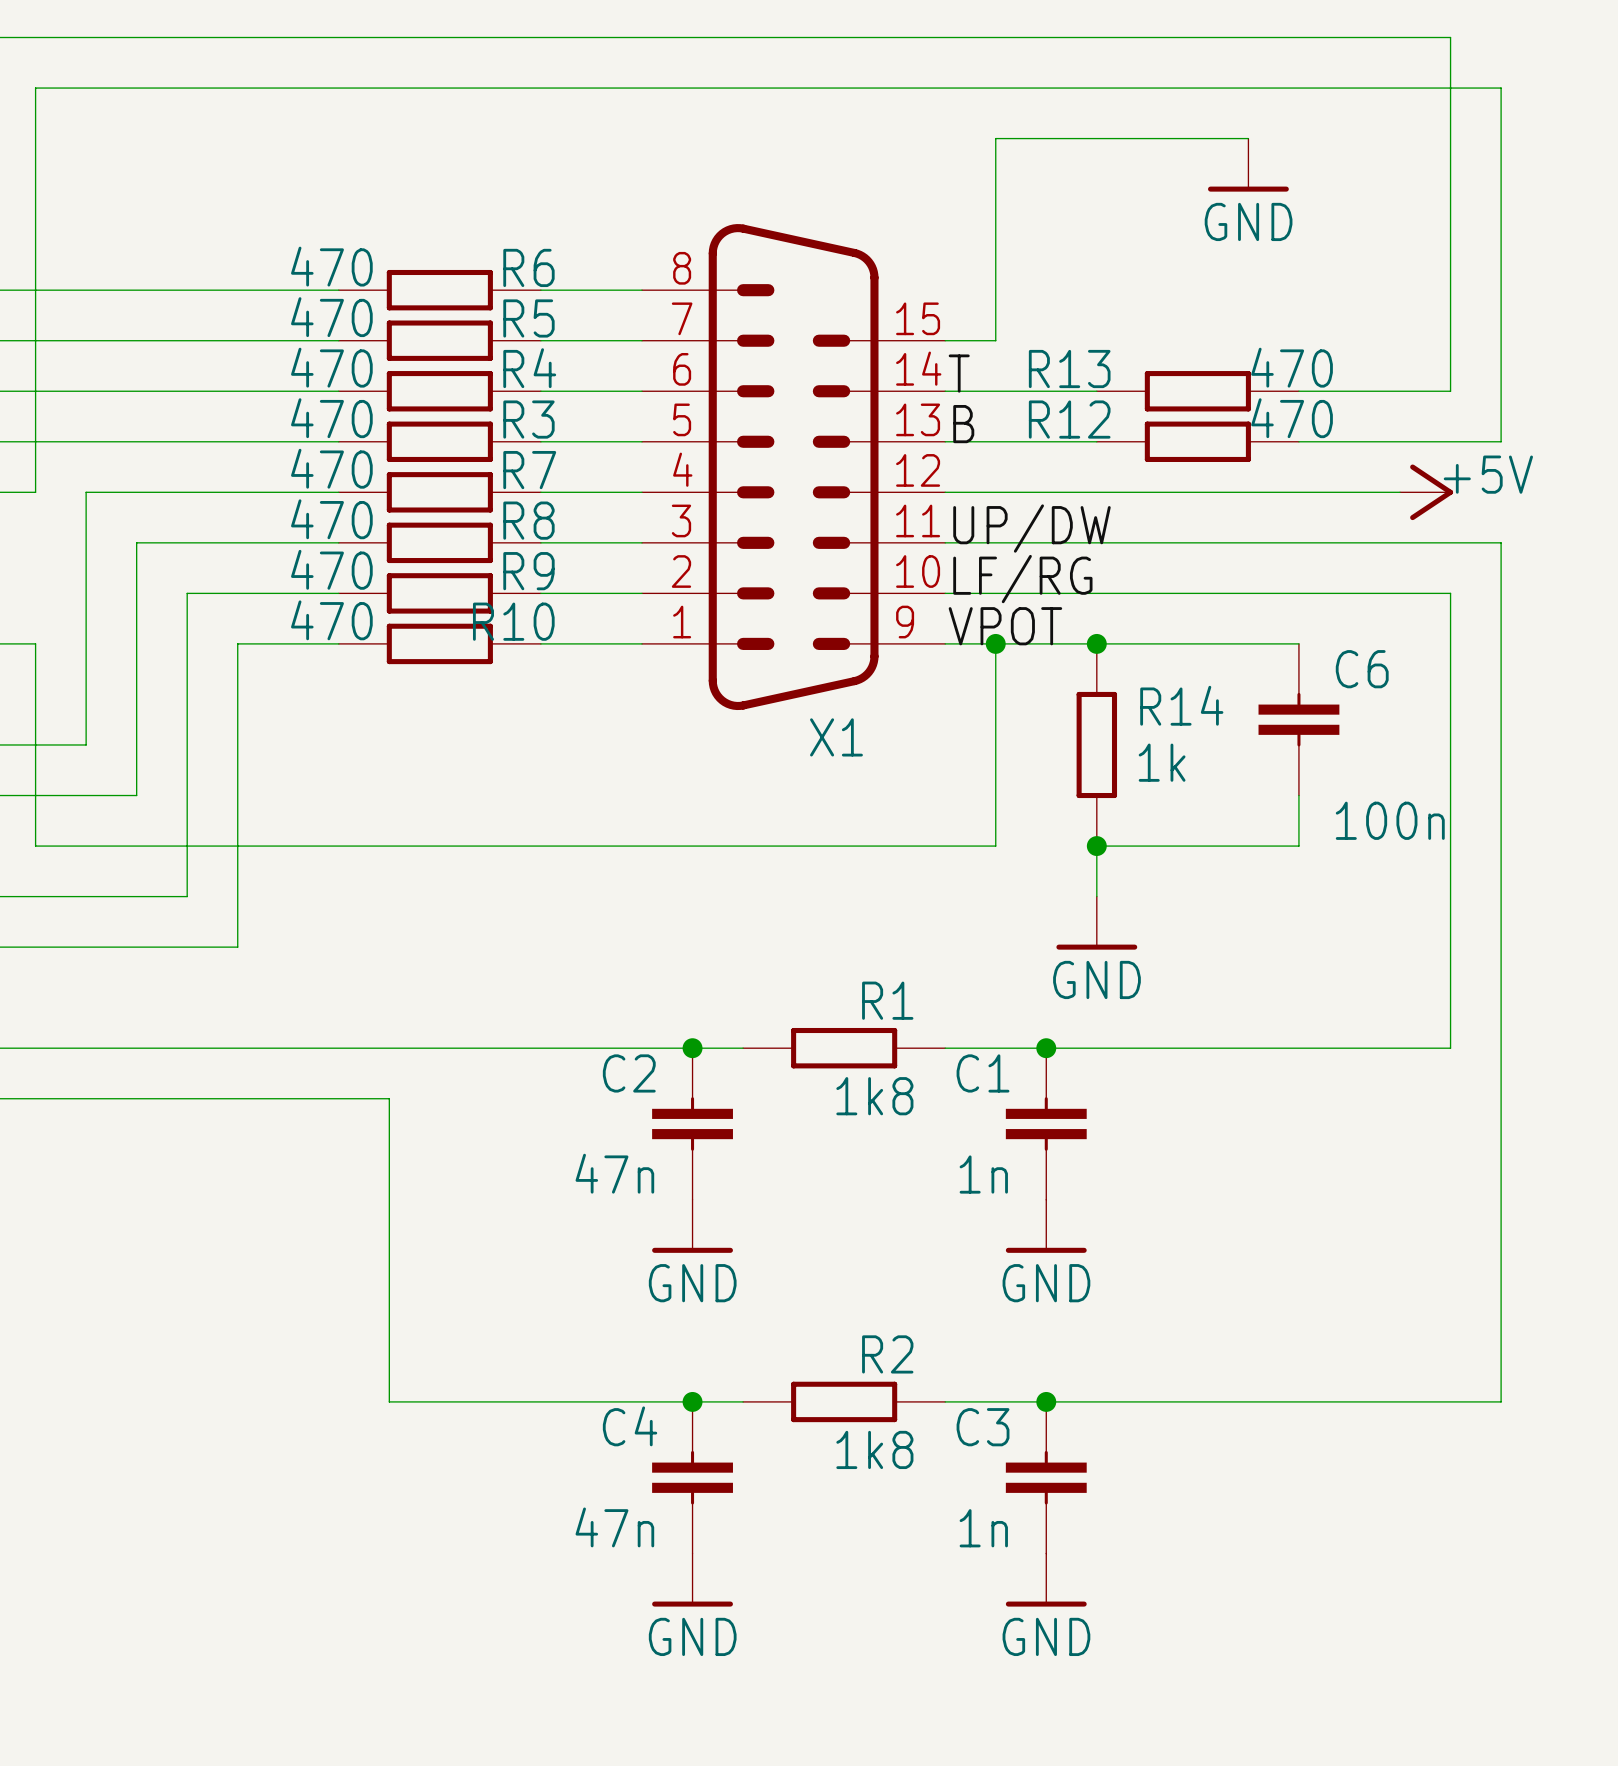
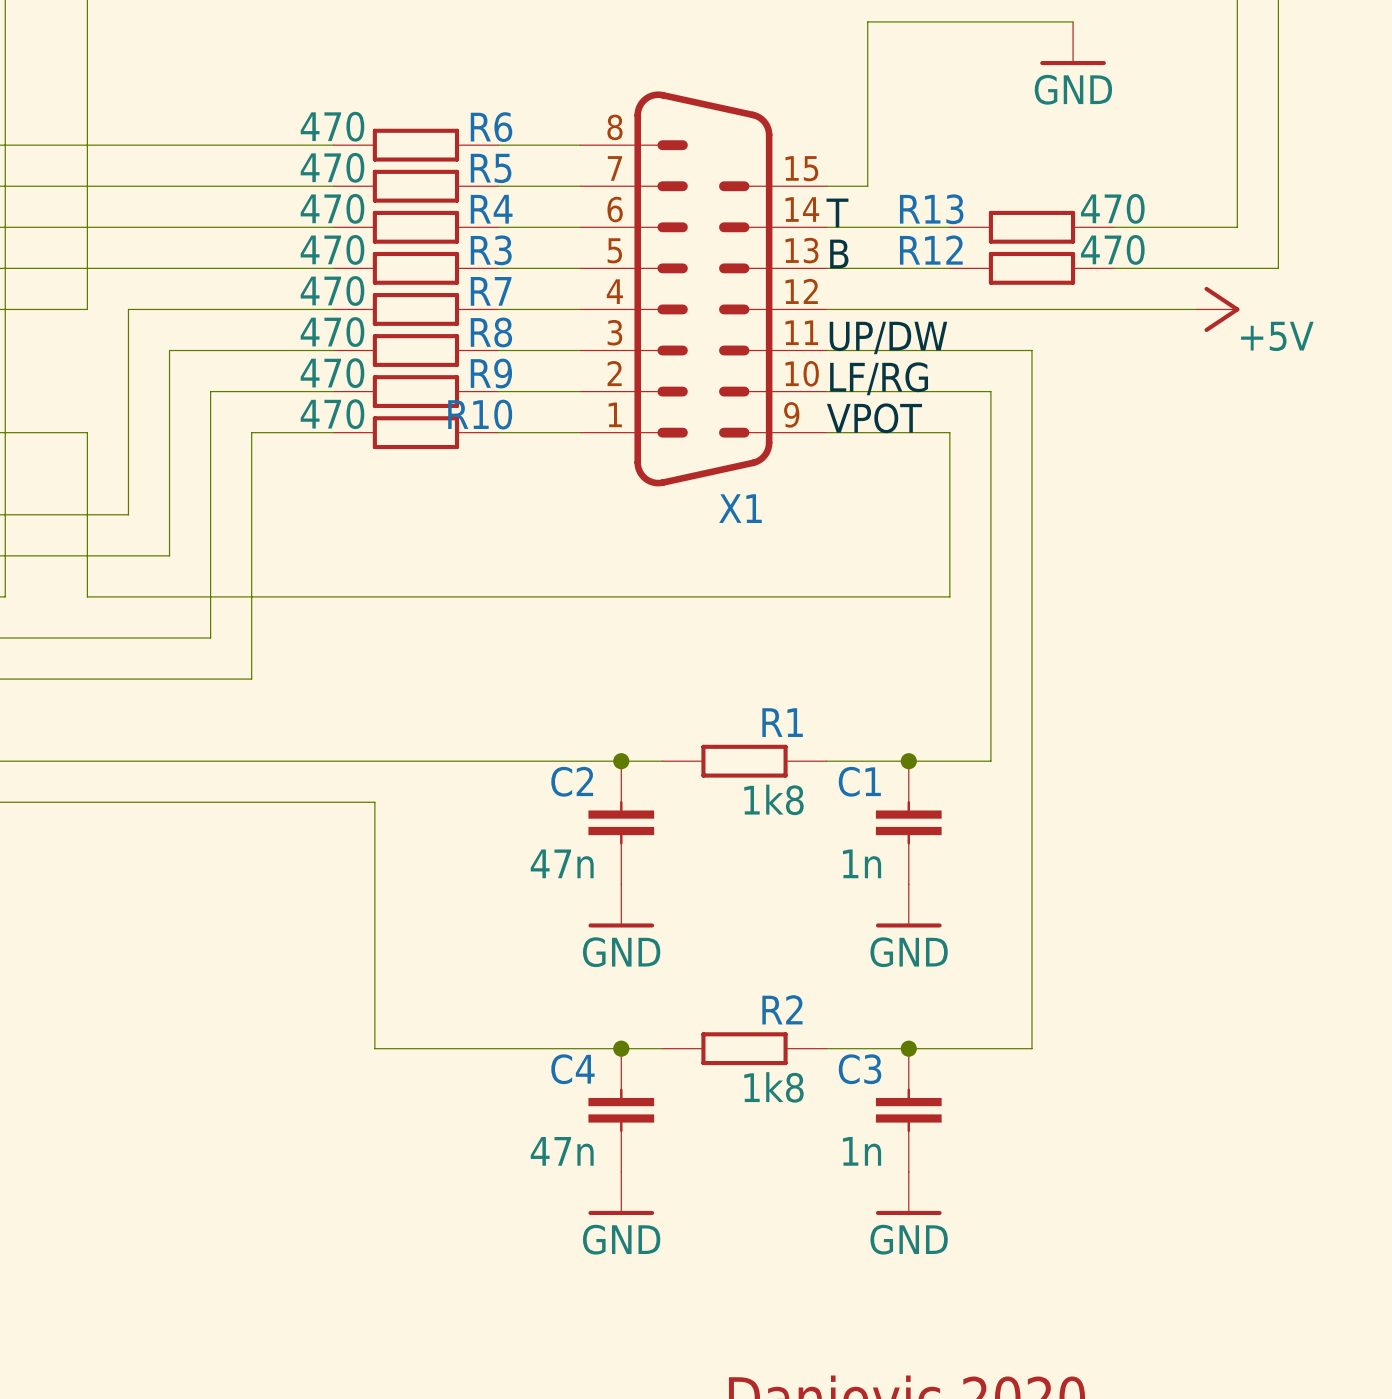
power symbol text position: +5V (1488, 474) -> +5V (1277, 336)
wire: (1197, 542) (1501, 542) (1501, 1401) (1197, 1401) -> (1031, 350) (1031, 1048)
wire: (1147, 593) (1450, 593) (1450, 1048) (1147, 1048) -> (990, 391) (990, 761)
wire: (995, 643) (995, 846) -> (949, 432) (949, 596) (867, 596)
junction: (995, 643) -> none
wire: (1096, 643) (1298, 643) -> none
junction: (1096, 643) -> none
C6: 100n (1298, 719) -> none
R14: 1k (1096, 744) -> none
wire: (1298, 795) (1298, 846) (1096, 846) (1096, 896) -> none
junction: (1096, 846) -> none
power symbol: GND (1096, 923) -> none

